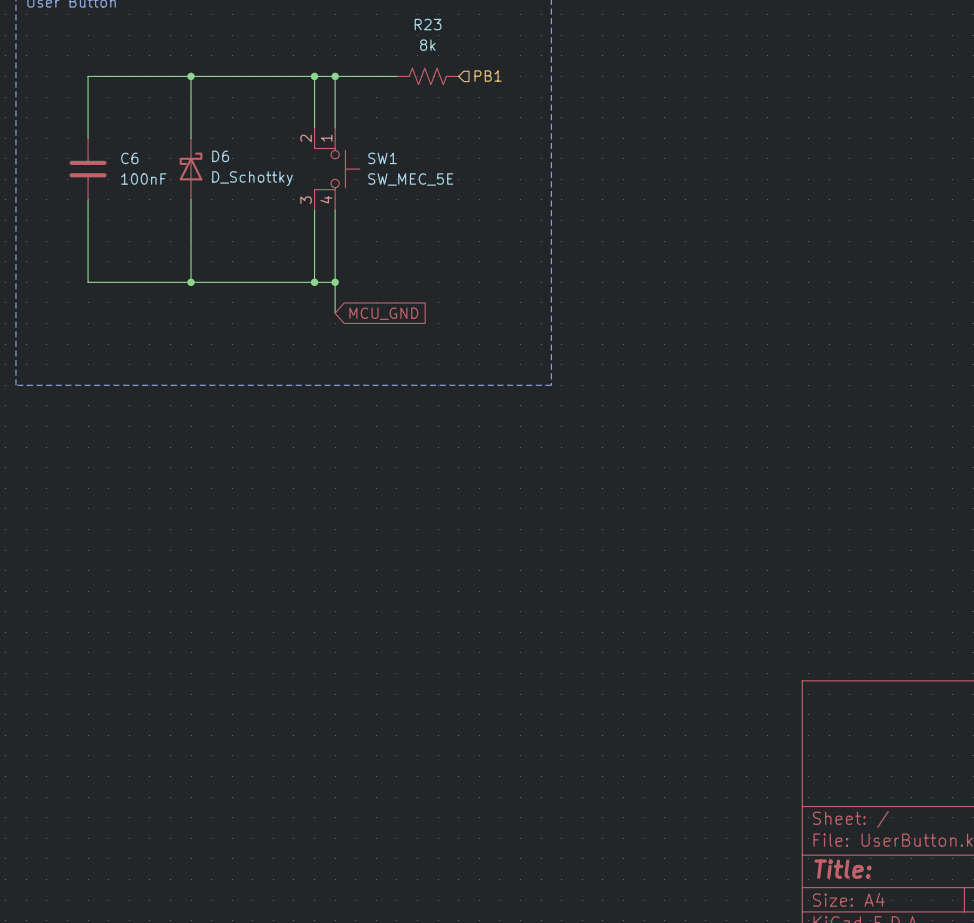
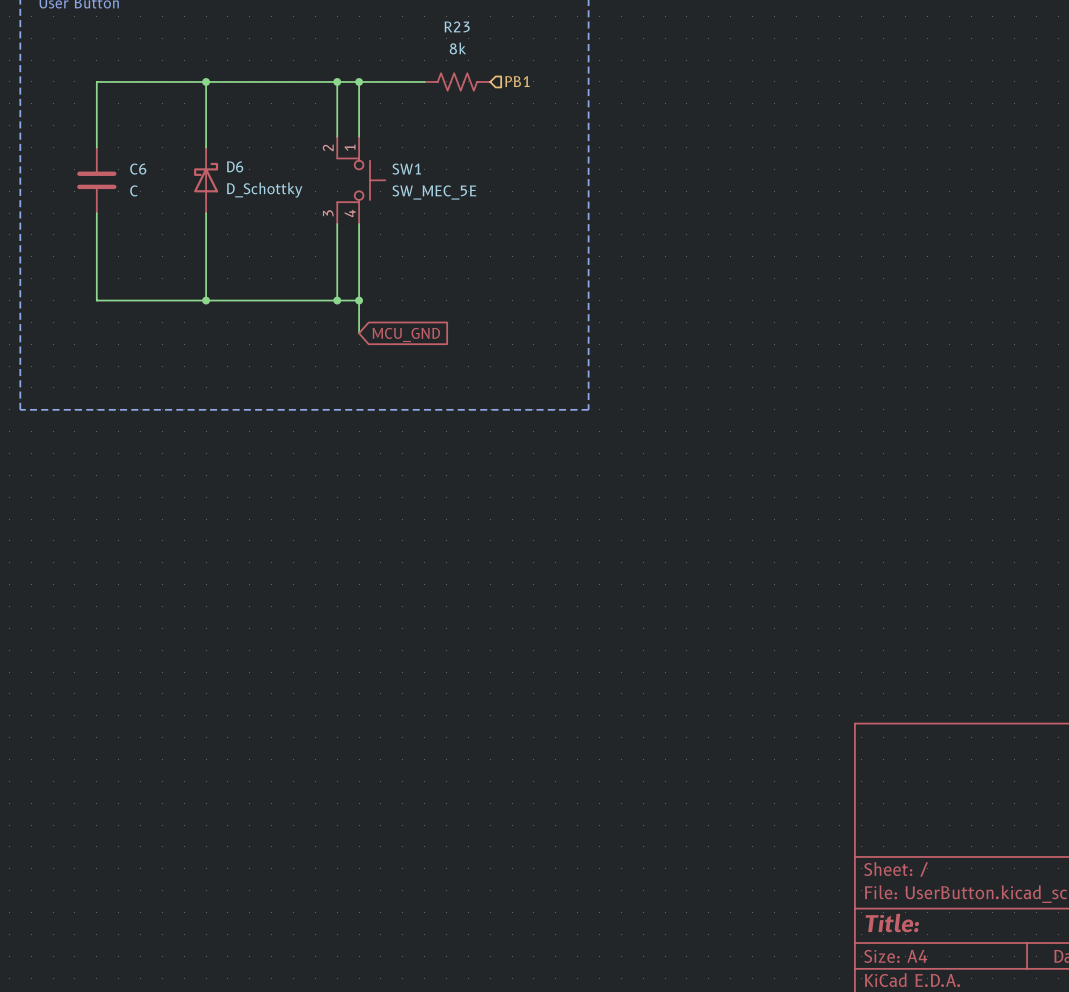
C6 value: 100nF (143, 178) -> C (133, 190)

